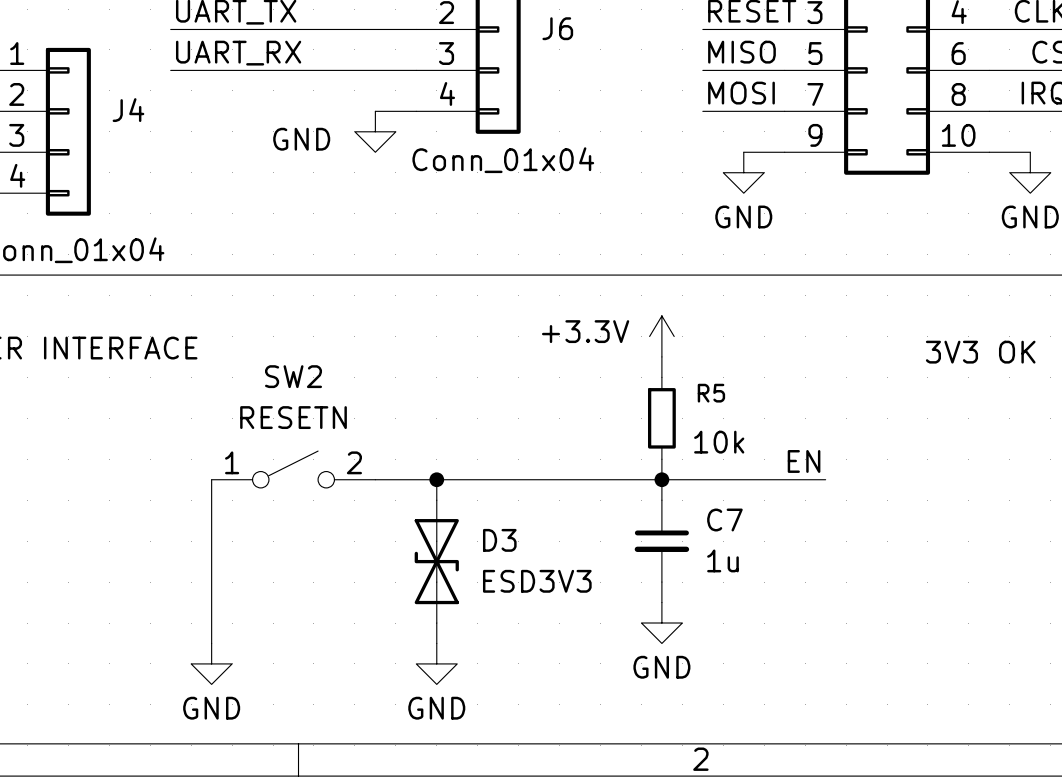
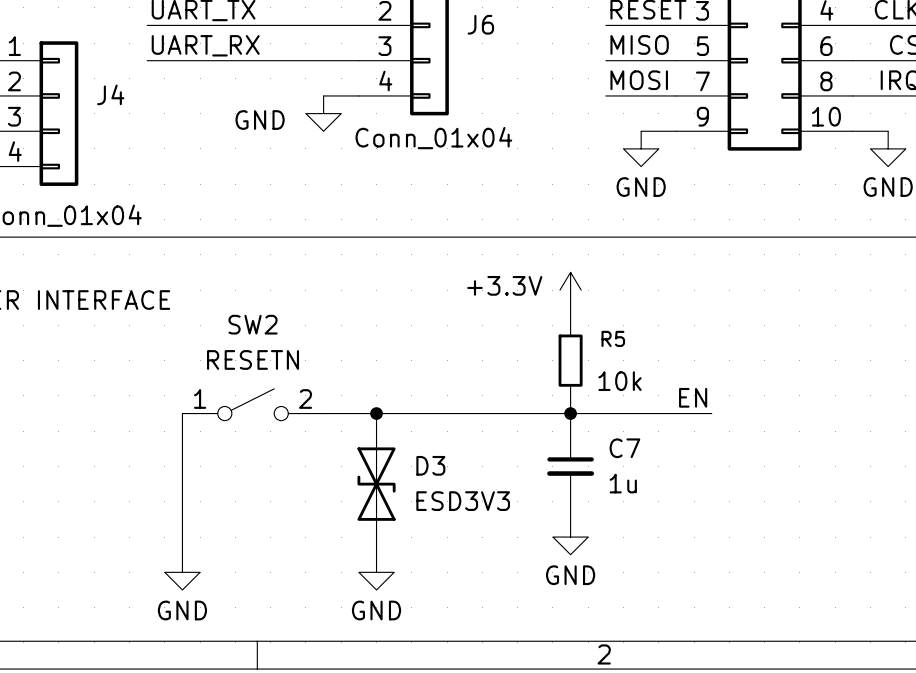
text: 3V3 OK (980, 352) -> none

